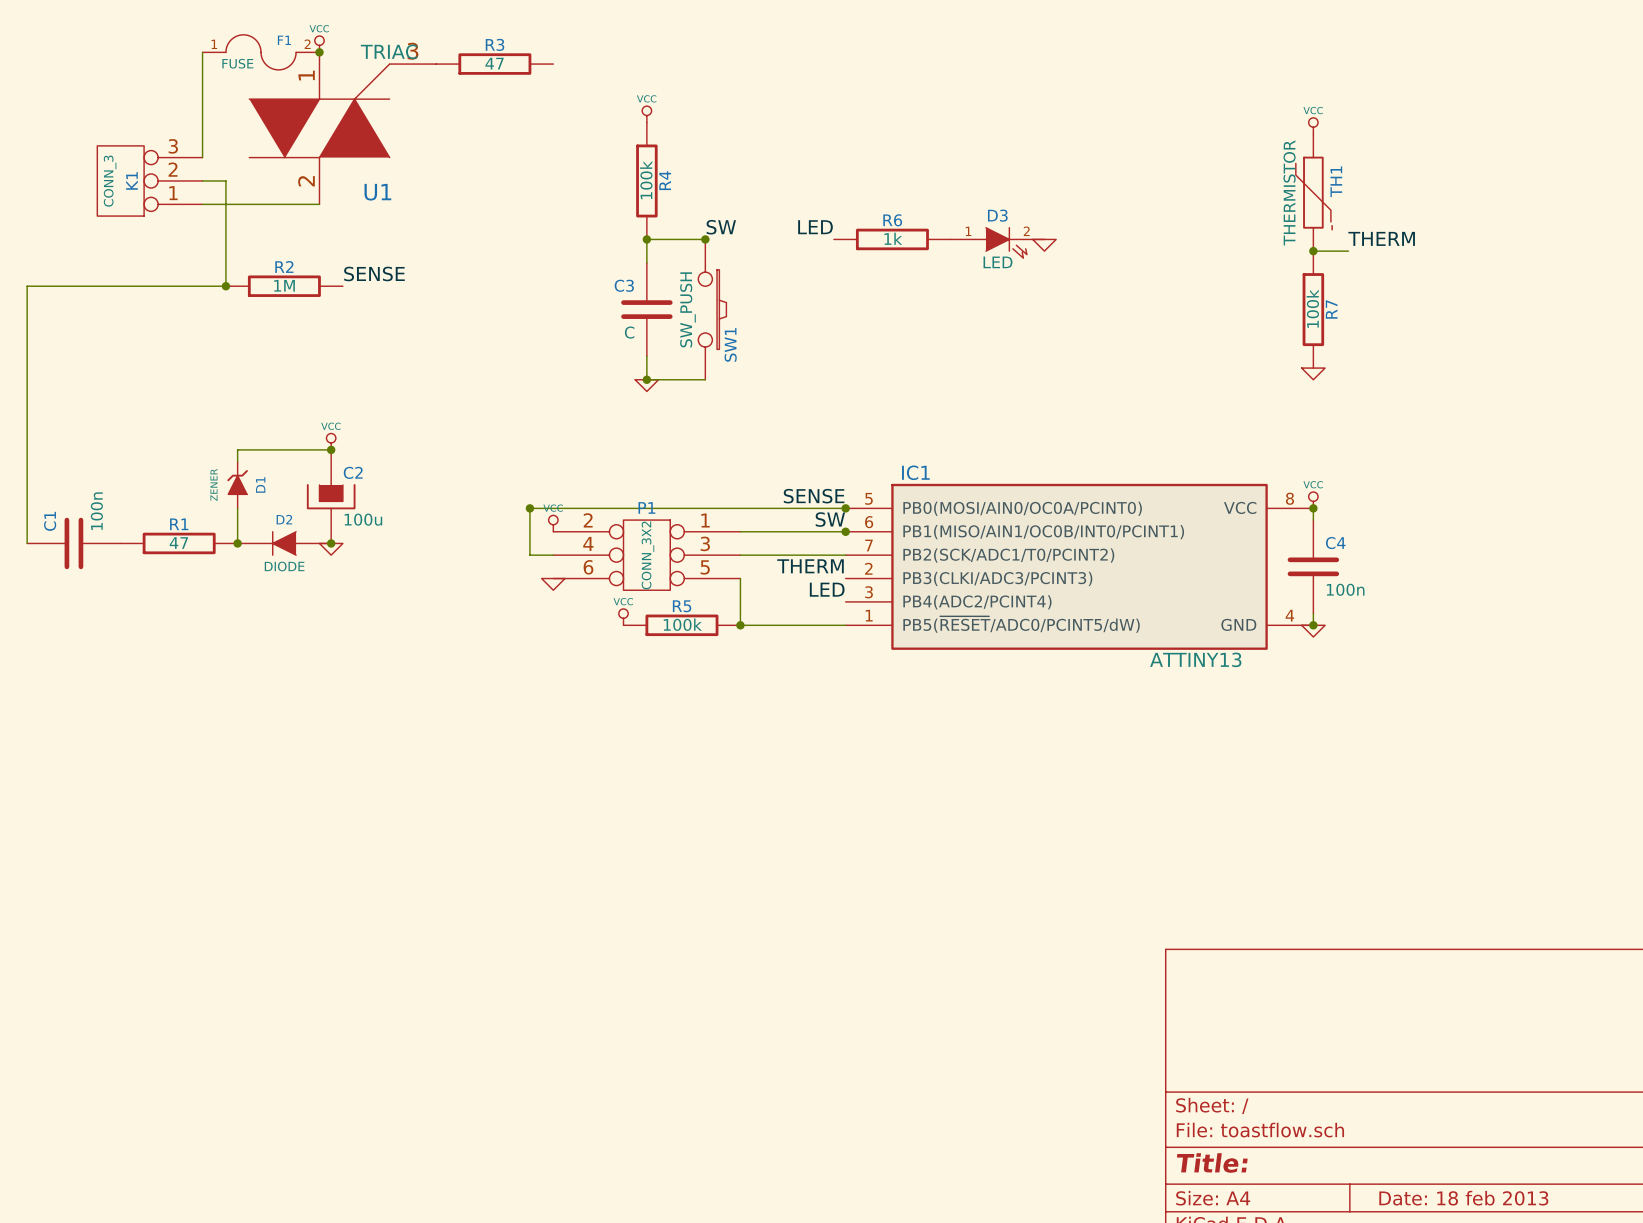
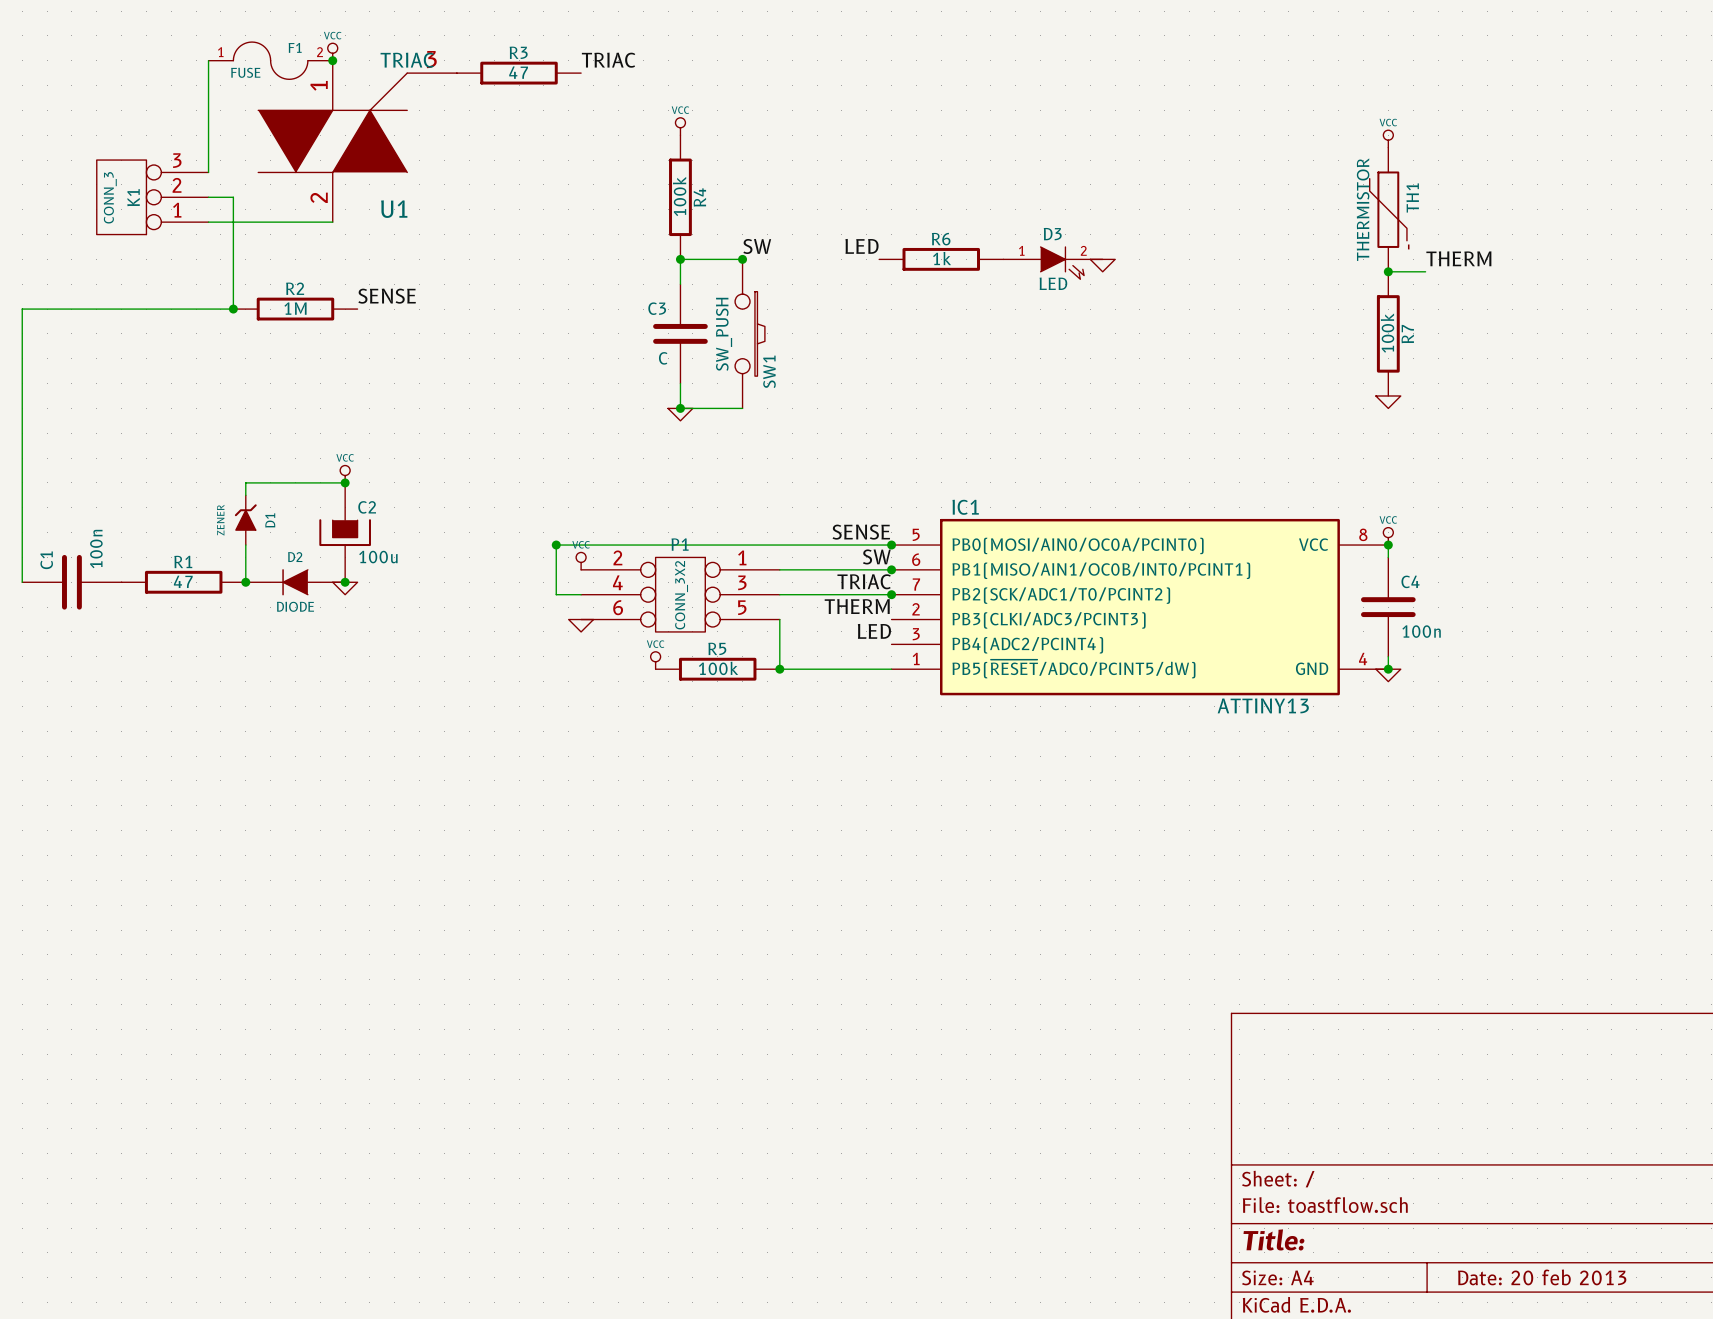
label: none -> TRIAC (608, 60)
label: none -> TRIAC (864, 581)
junction: none -> (891, 594)
title block: Date: 18 feb 2013 (1463, 1198) -> Date: 20 feb 2013 (1542, 1277)

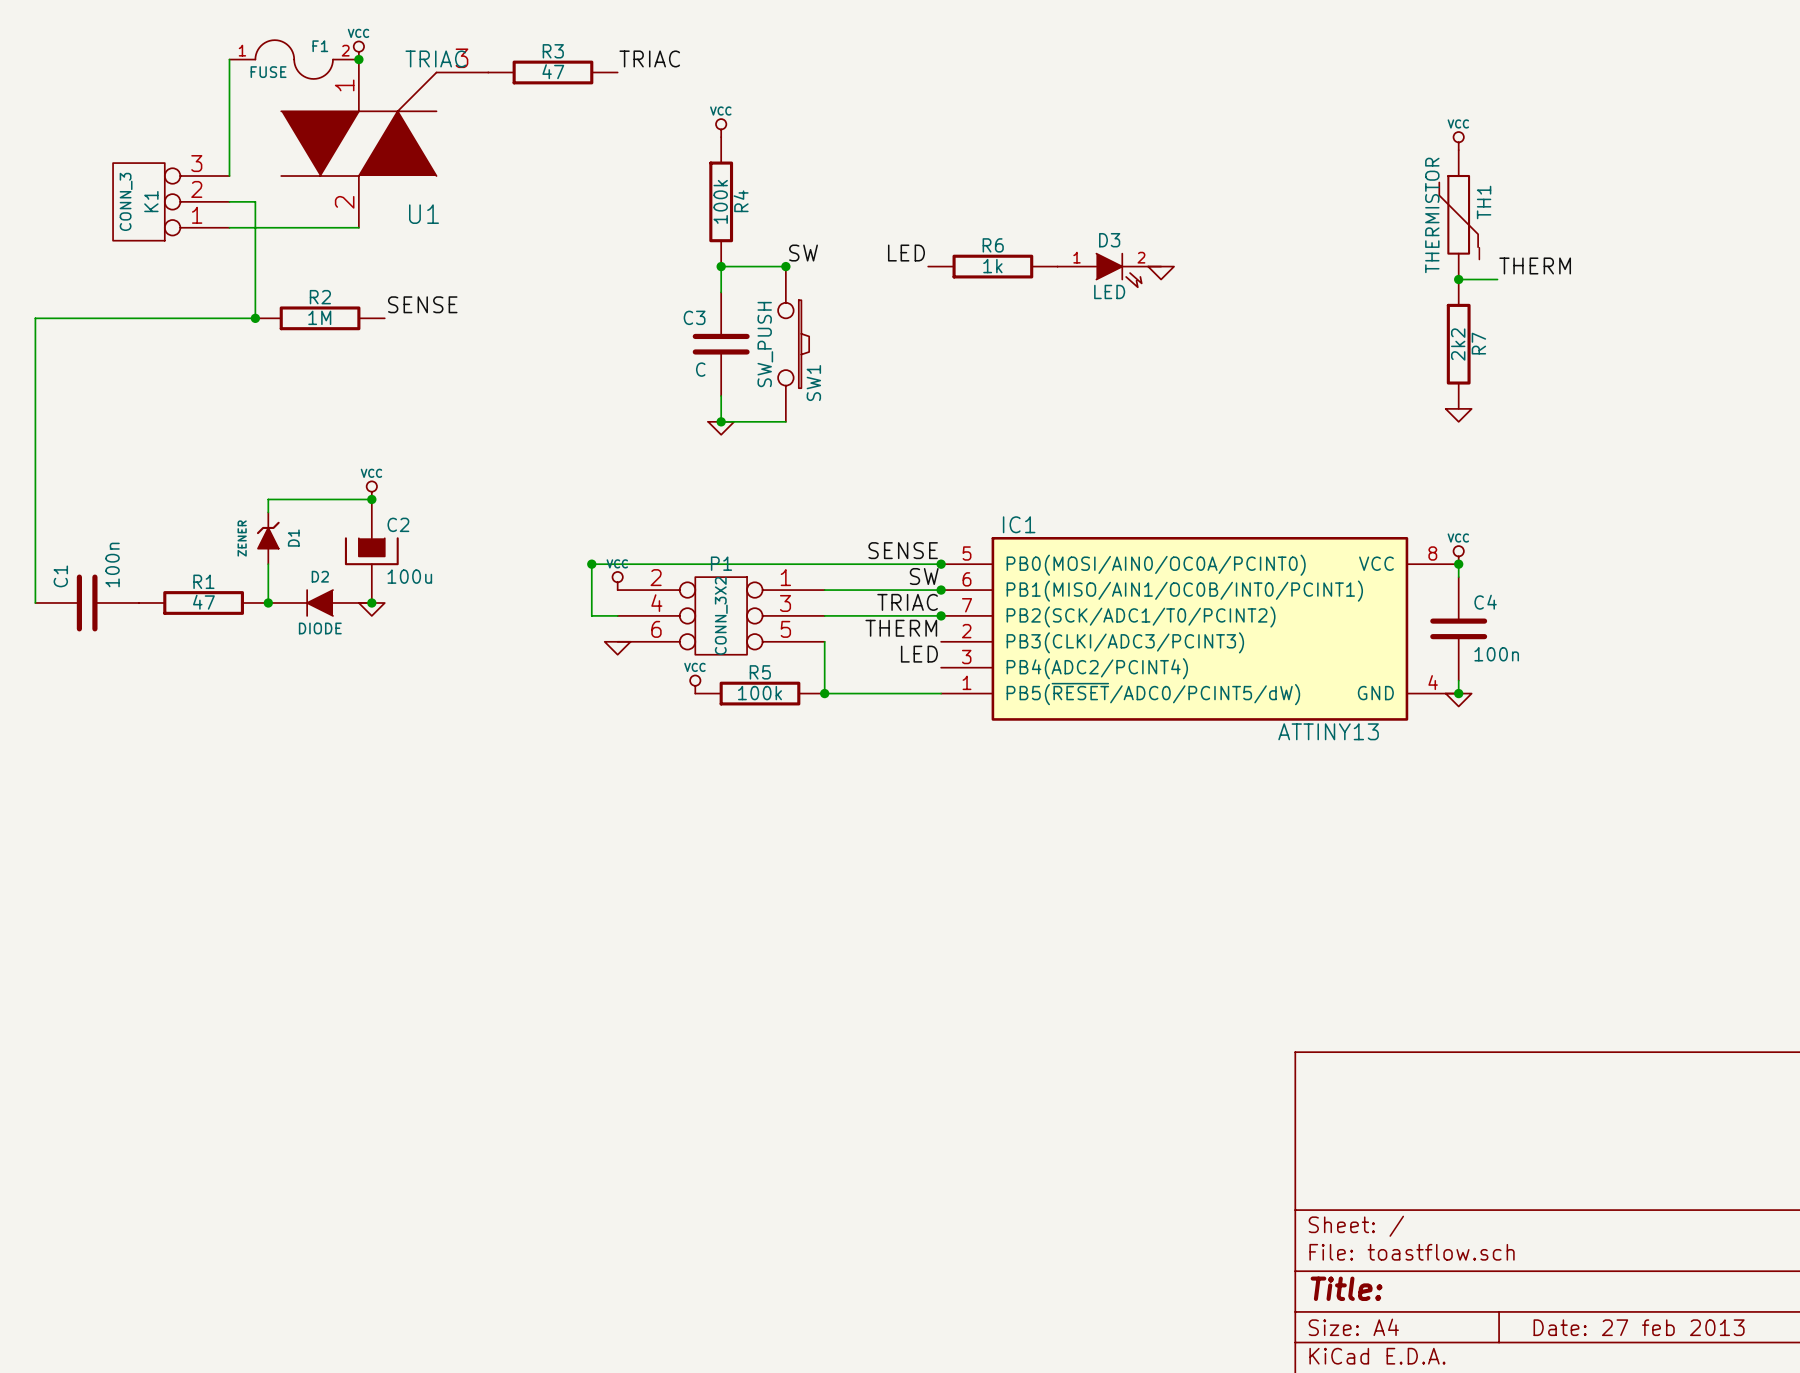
R7 value: 100k (1387, 333) -> 2k2 (1458, 344)
title block: Date: 20 feb 2013 (1542, 1277) -> Date: 27 feb 2013 (1639, 1327)

